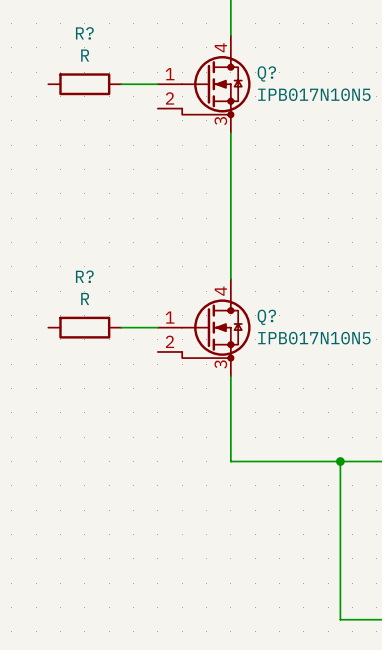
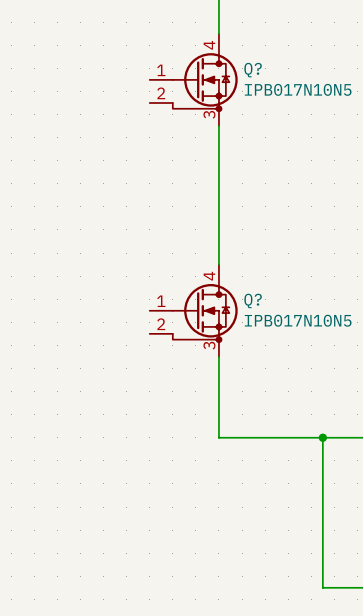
R?: R (84, 84) -> none
wire: (121, 84) (157, 84) -> none
R?: R (84, 327) -> none
wire: (121, 327) (157, 327) -> none

